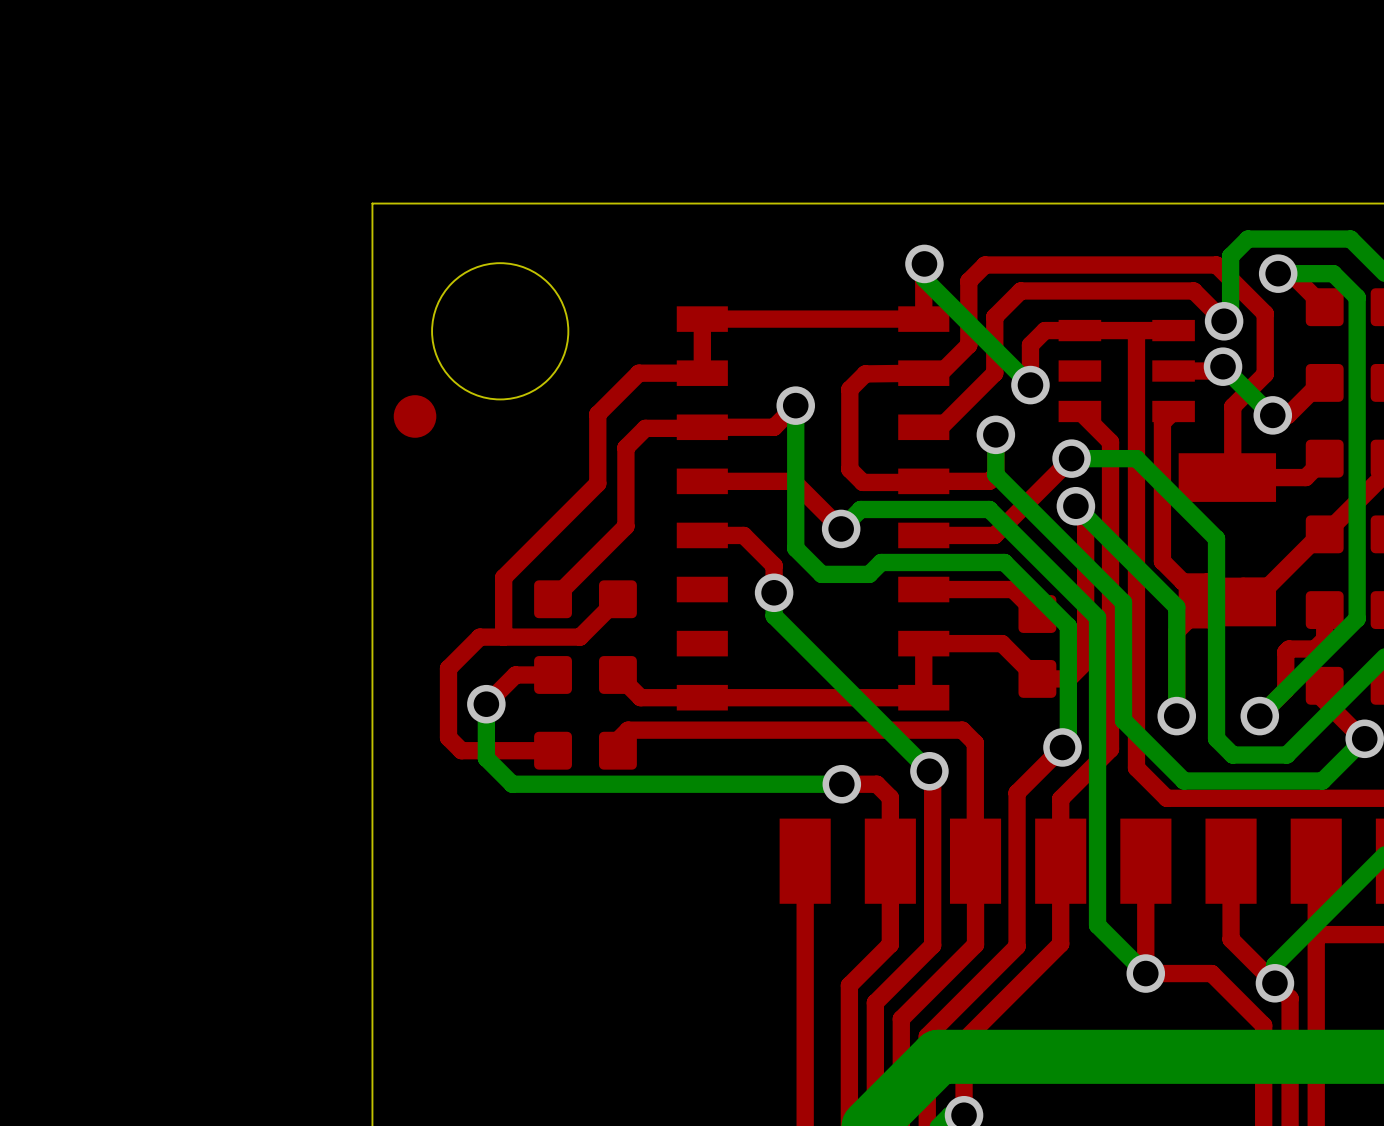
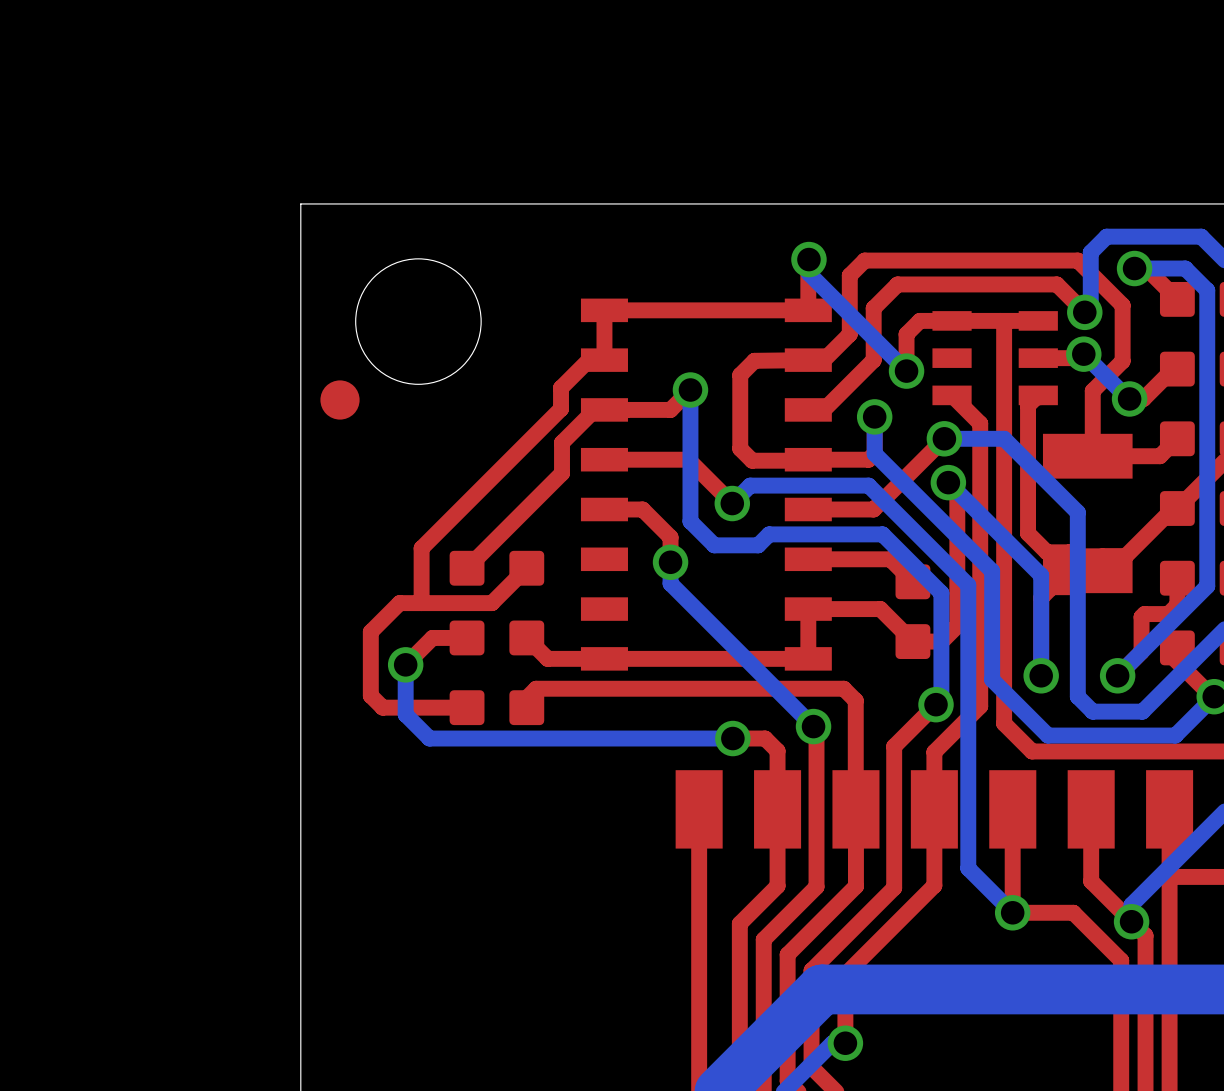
top track: (685, 373) (638, 373) (597, 414) (597, 483) -> (588, 360) (561, 388) (561, 408) (508, 461)
top track: (724, 428) (645, 428) (625, 447) (625, 526) -> (604, 409) (594, 409) (562, 442) (562, 473) (534, 501)

